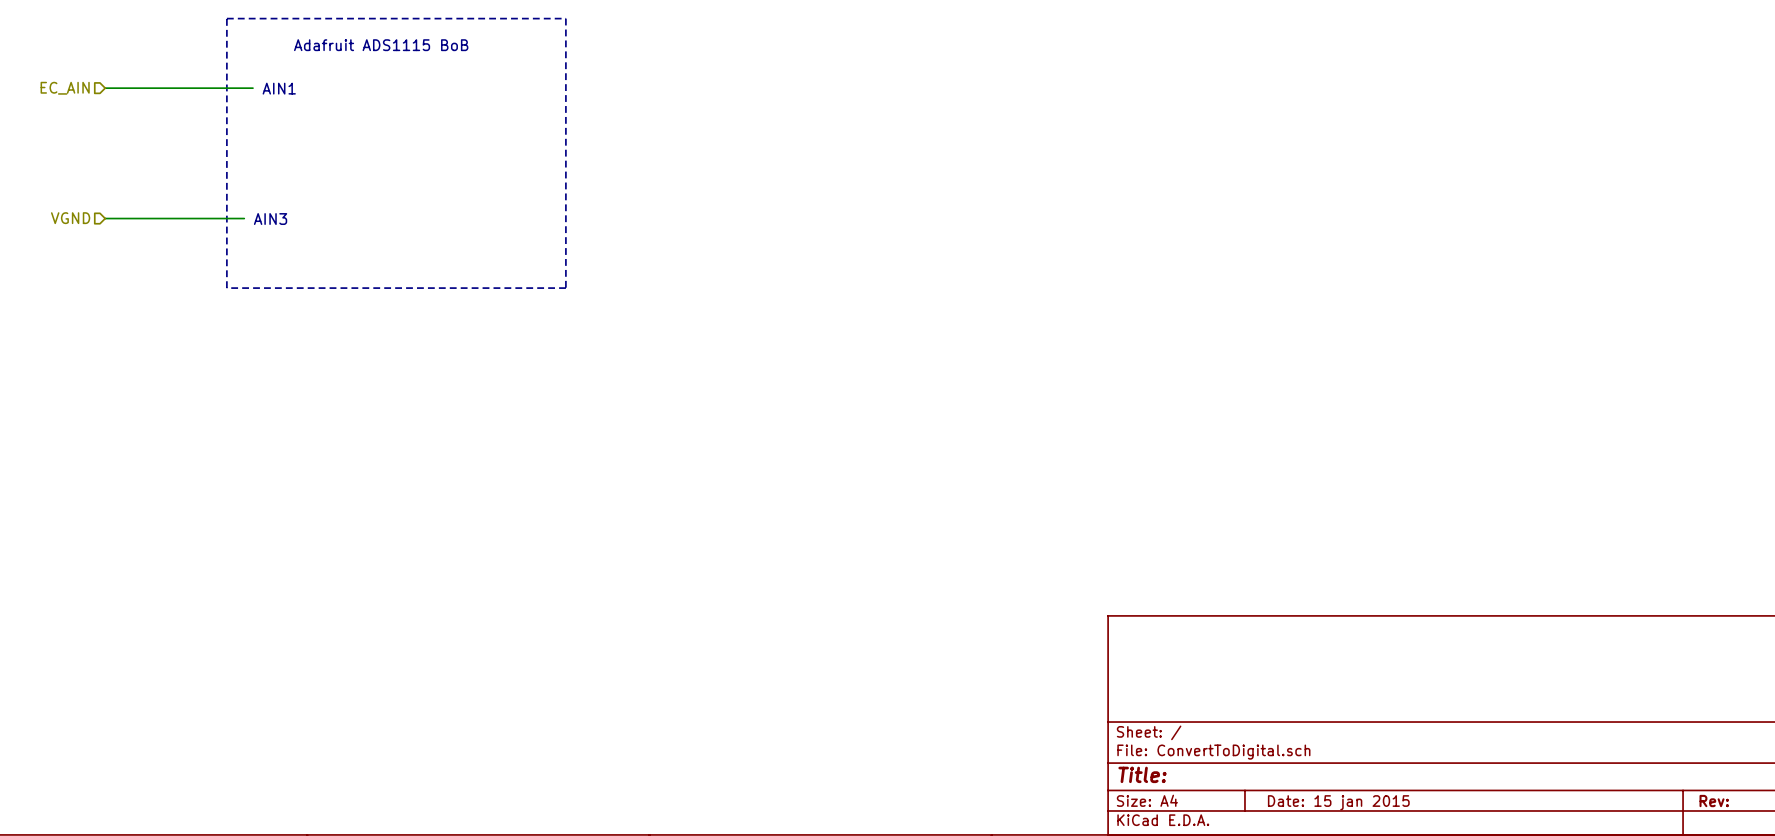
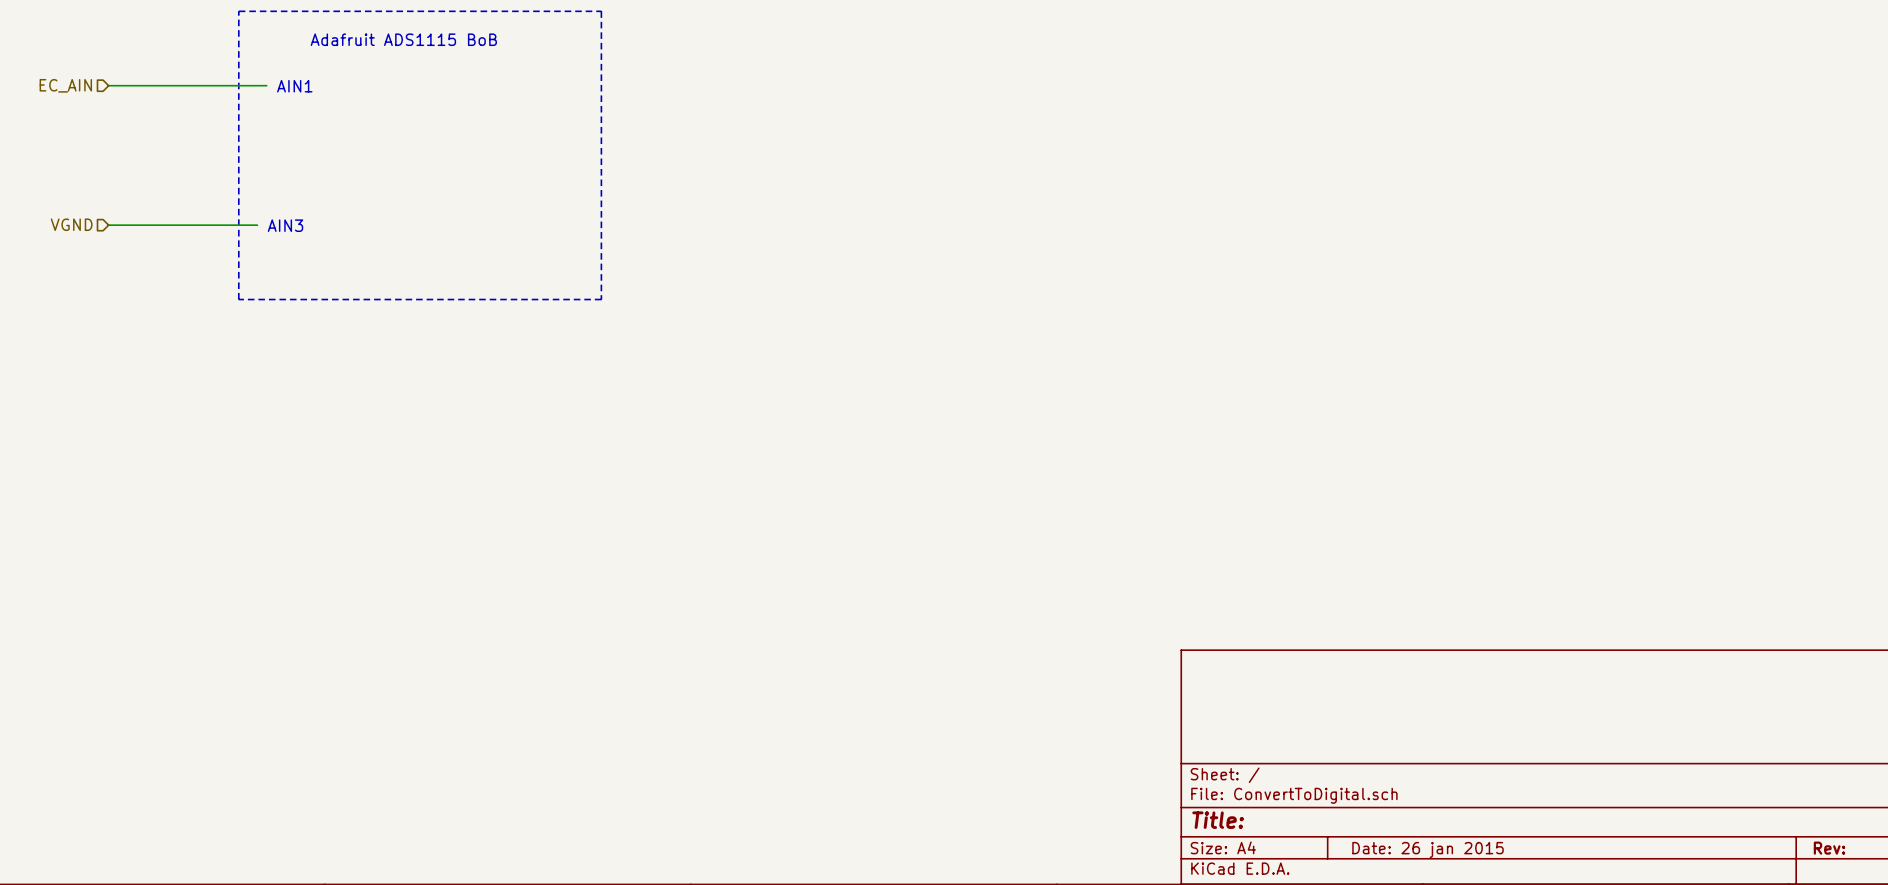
title block: Date: 15 jan 2015 (1338, 802) -> Date: 26 jan 2015 (1428, 849)

